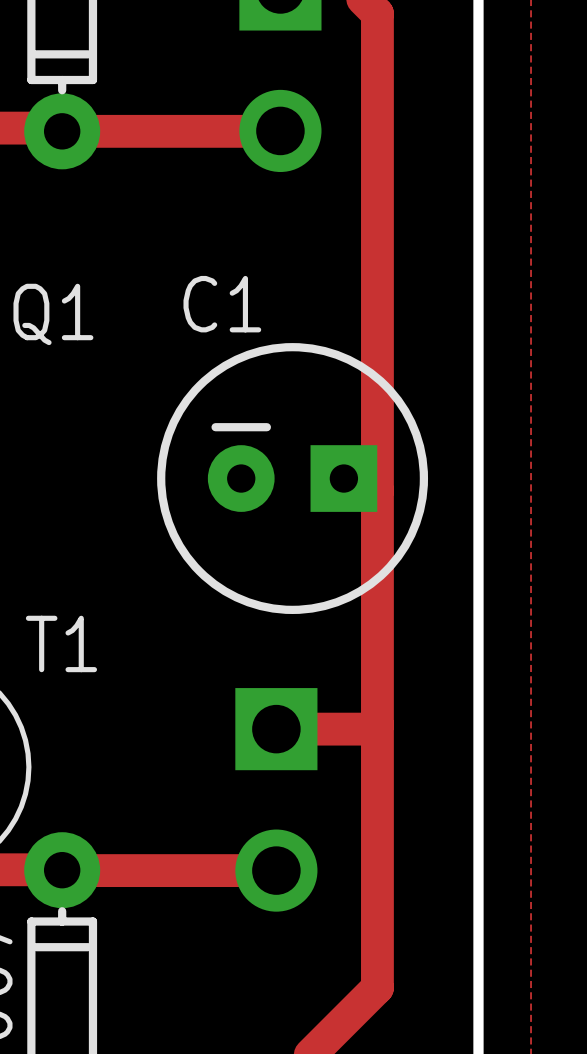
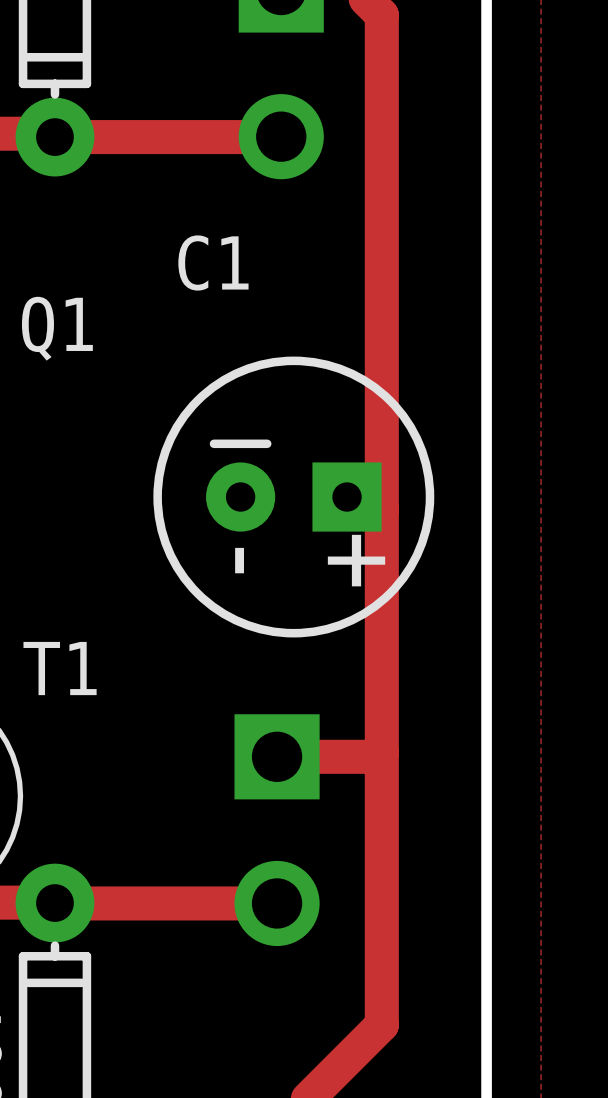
C1 name position: C1 (222, 304) -> C1 (213, 262)
text: none -> - (239, 560)
text: none -> + (356, 560)

